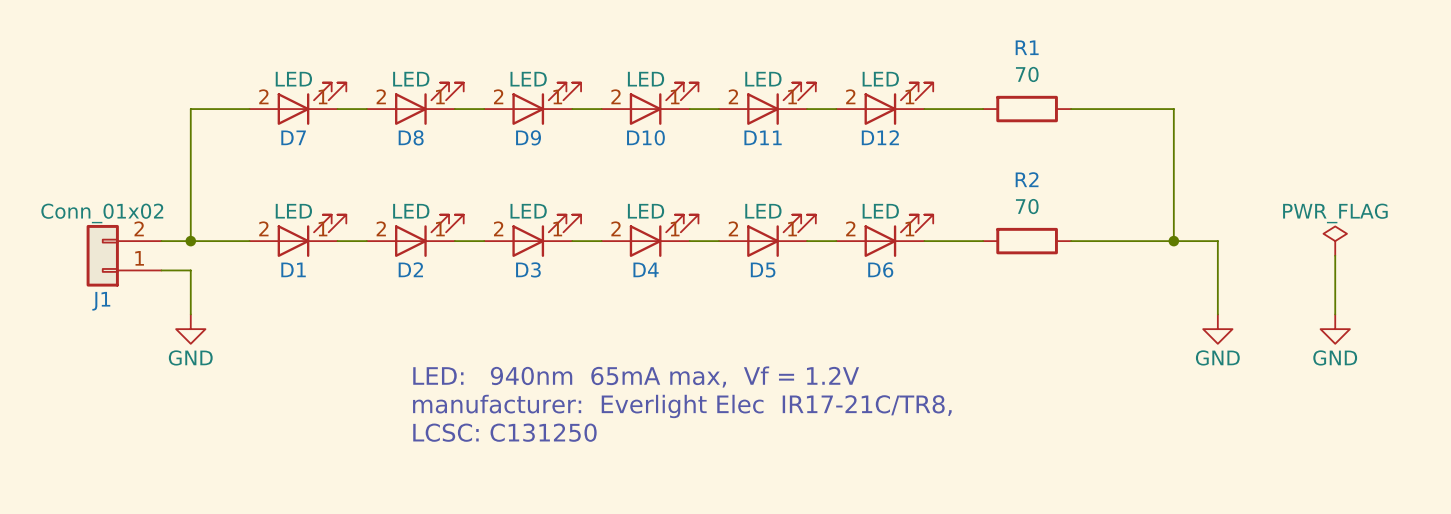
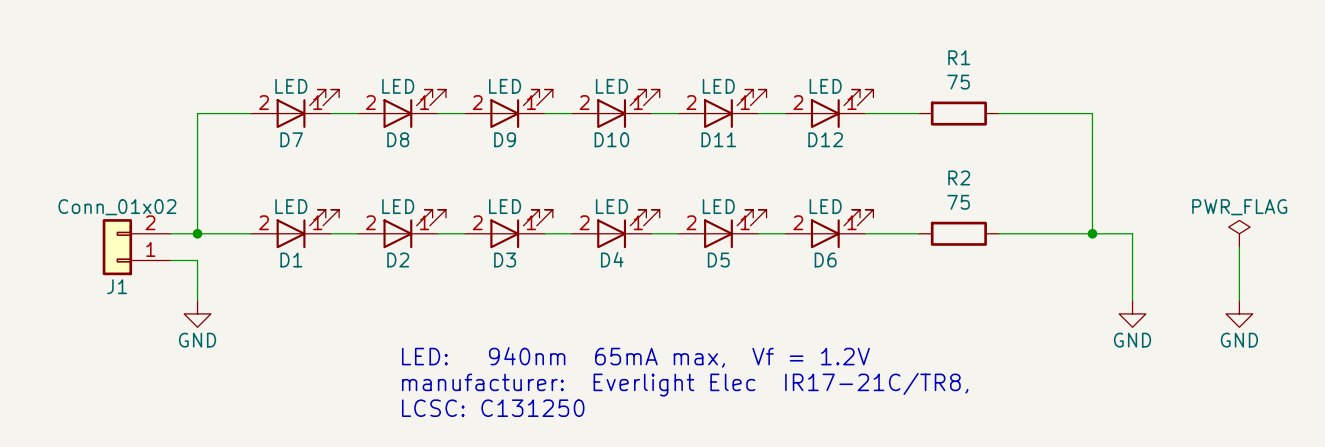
R1 value: 70 (1027, 74) -> 75 (958, 82)
R2 value: 70 (1027, 206) -> 75 (958, 202)

